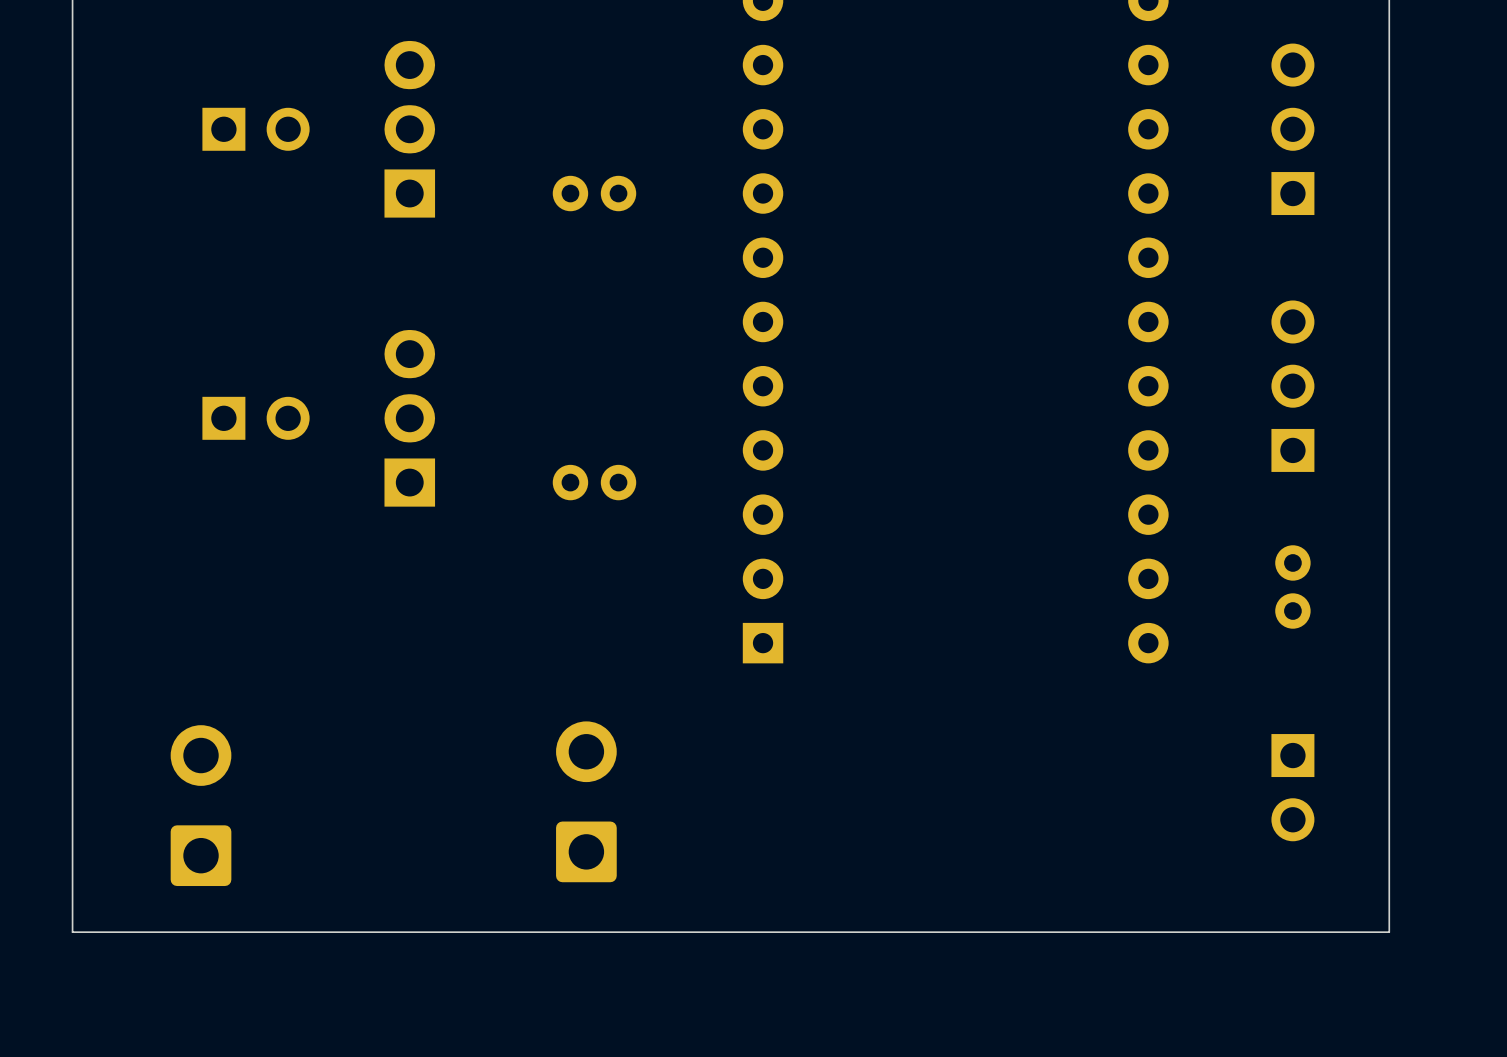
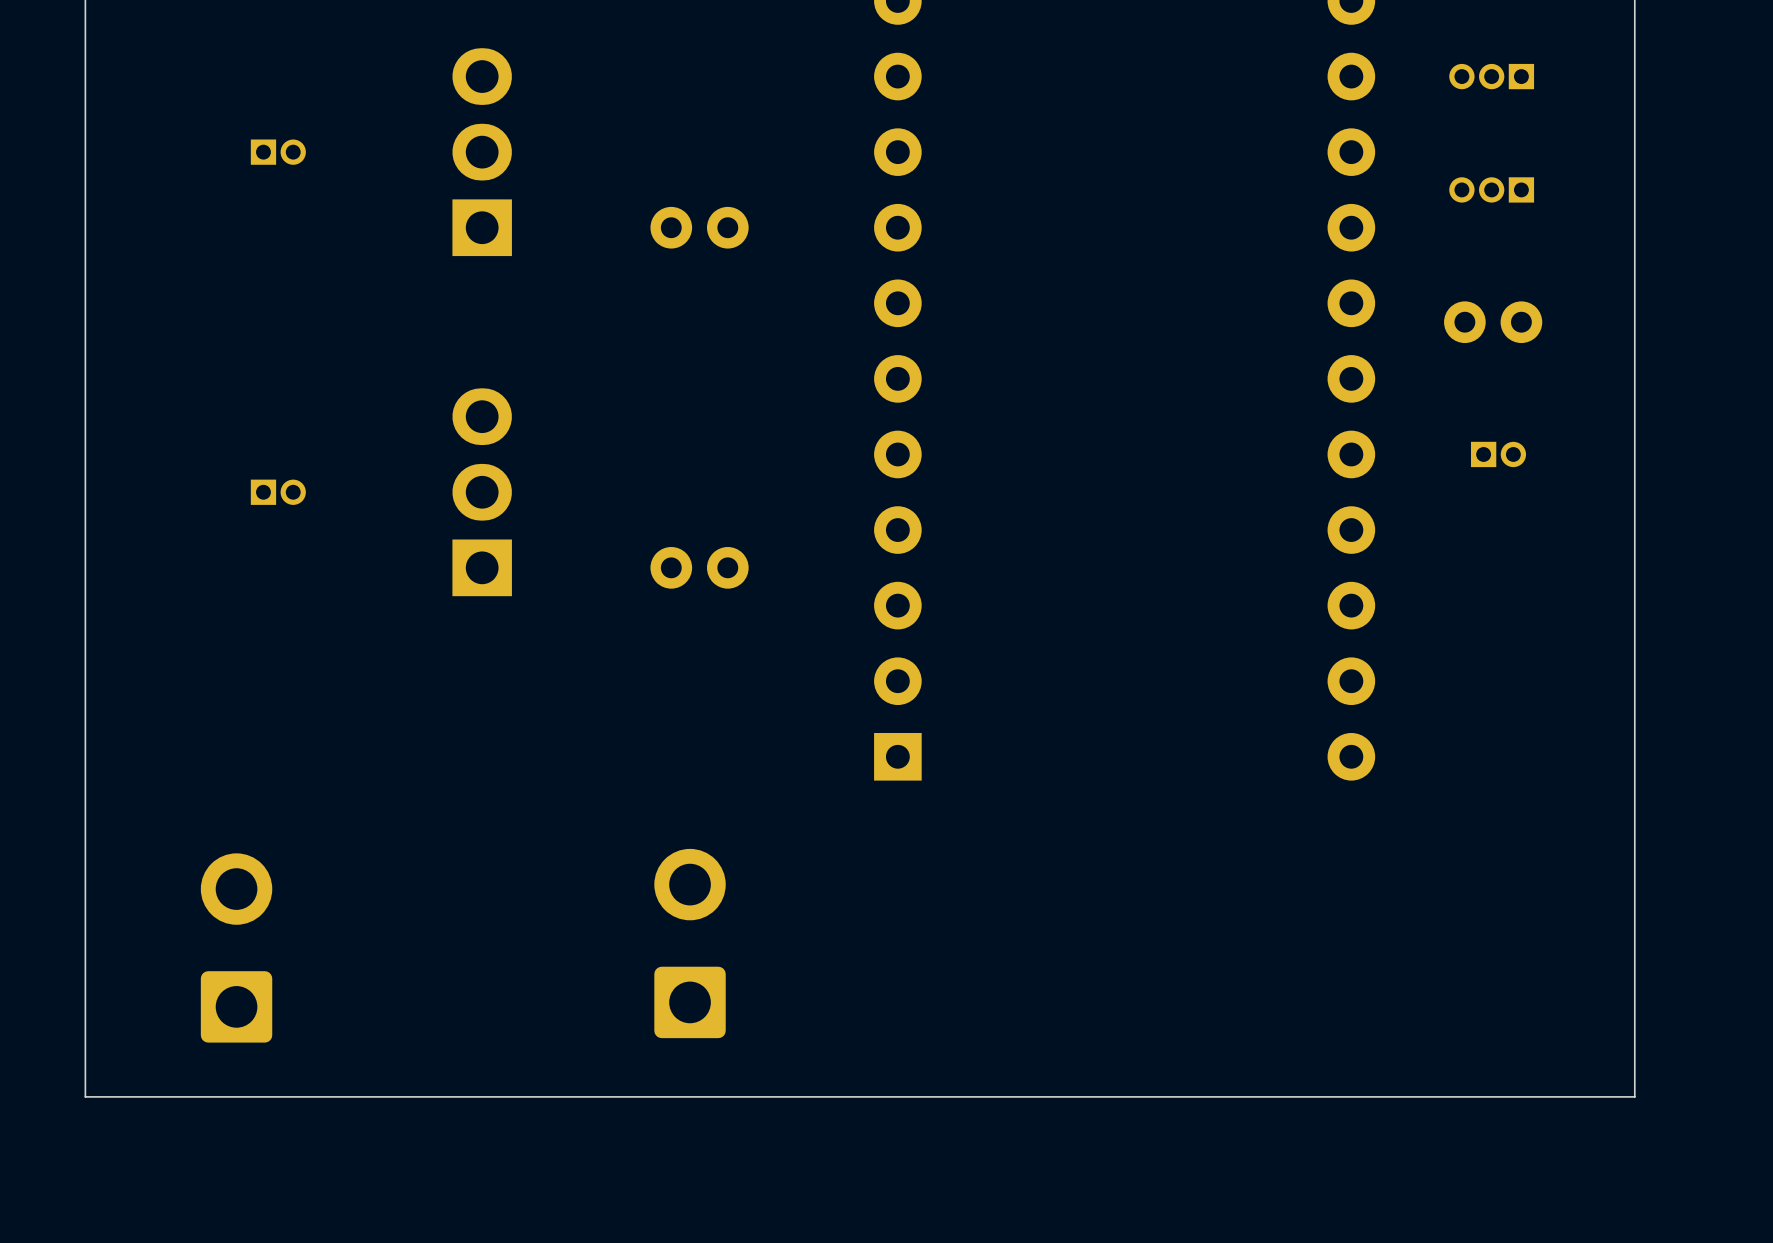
part: none -> (1491, 76)
part footprint: [202, 107, 310, 151] -> [250, 139, 306, 165]
part: (1292, 129) -> none
part: none -> (1491, 189)
part footprint: [1271, 300, 1315, 472] -> [1470, 441, 1527, 468]
part footprint: [202, 396, 310, 440] -> [250, 479, 306, 505]
part rotation: 0° (1292, 586) -> 90° clockwise (1493, 322)
part position: (1292, 586) -> (1493, 322)
part: (1292, 787) -> none

